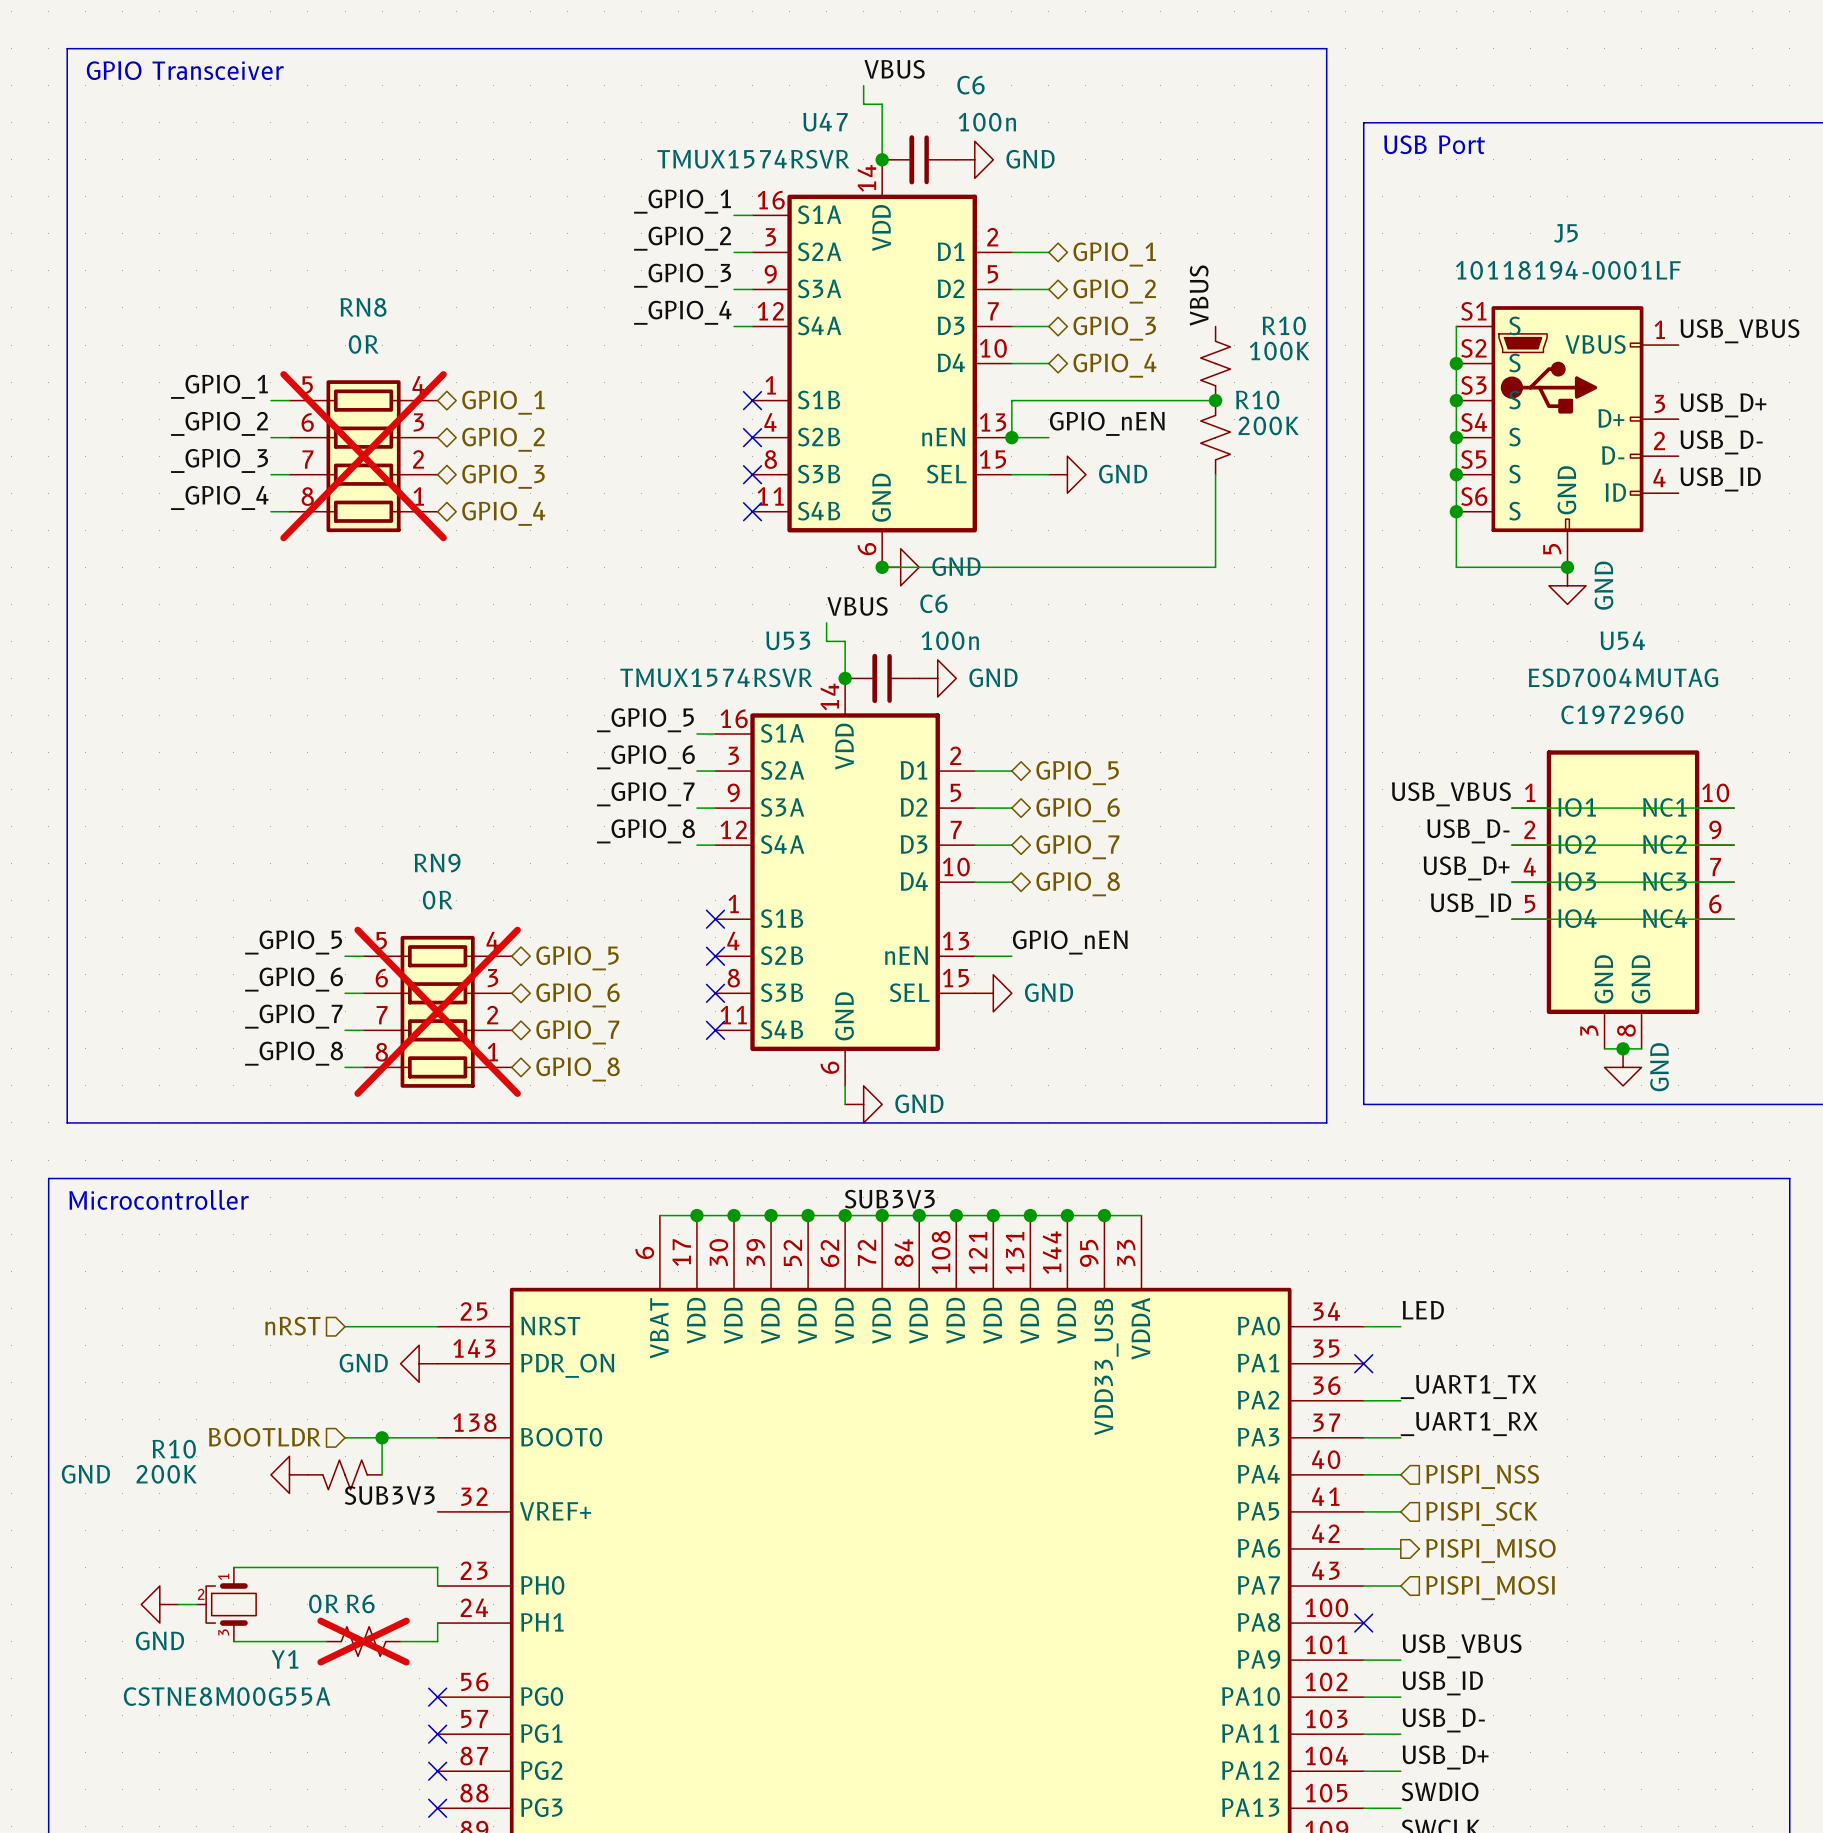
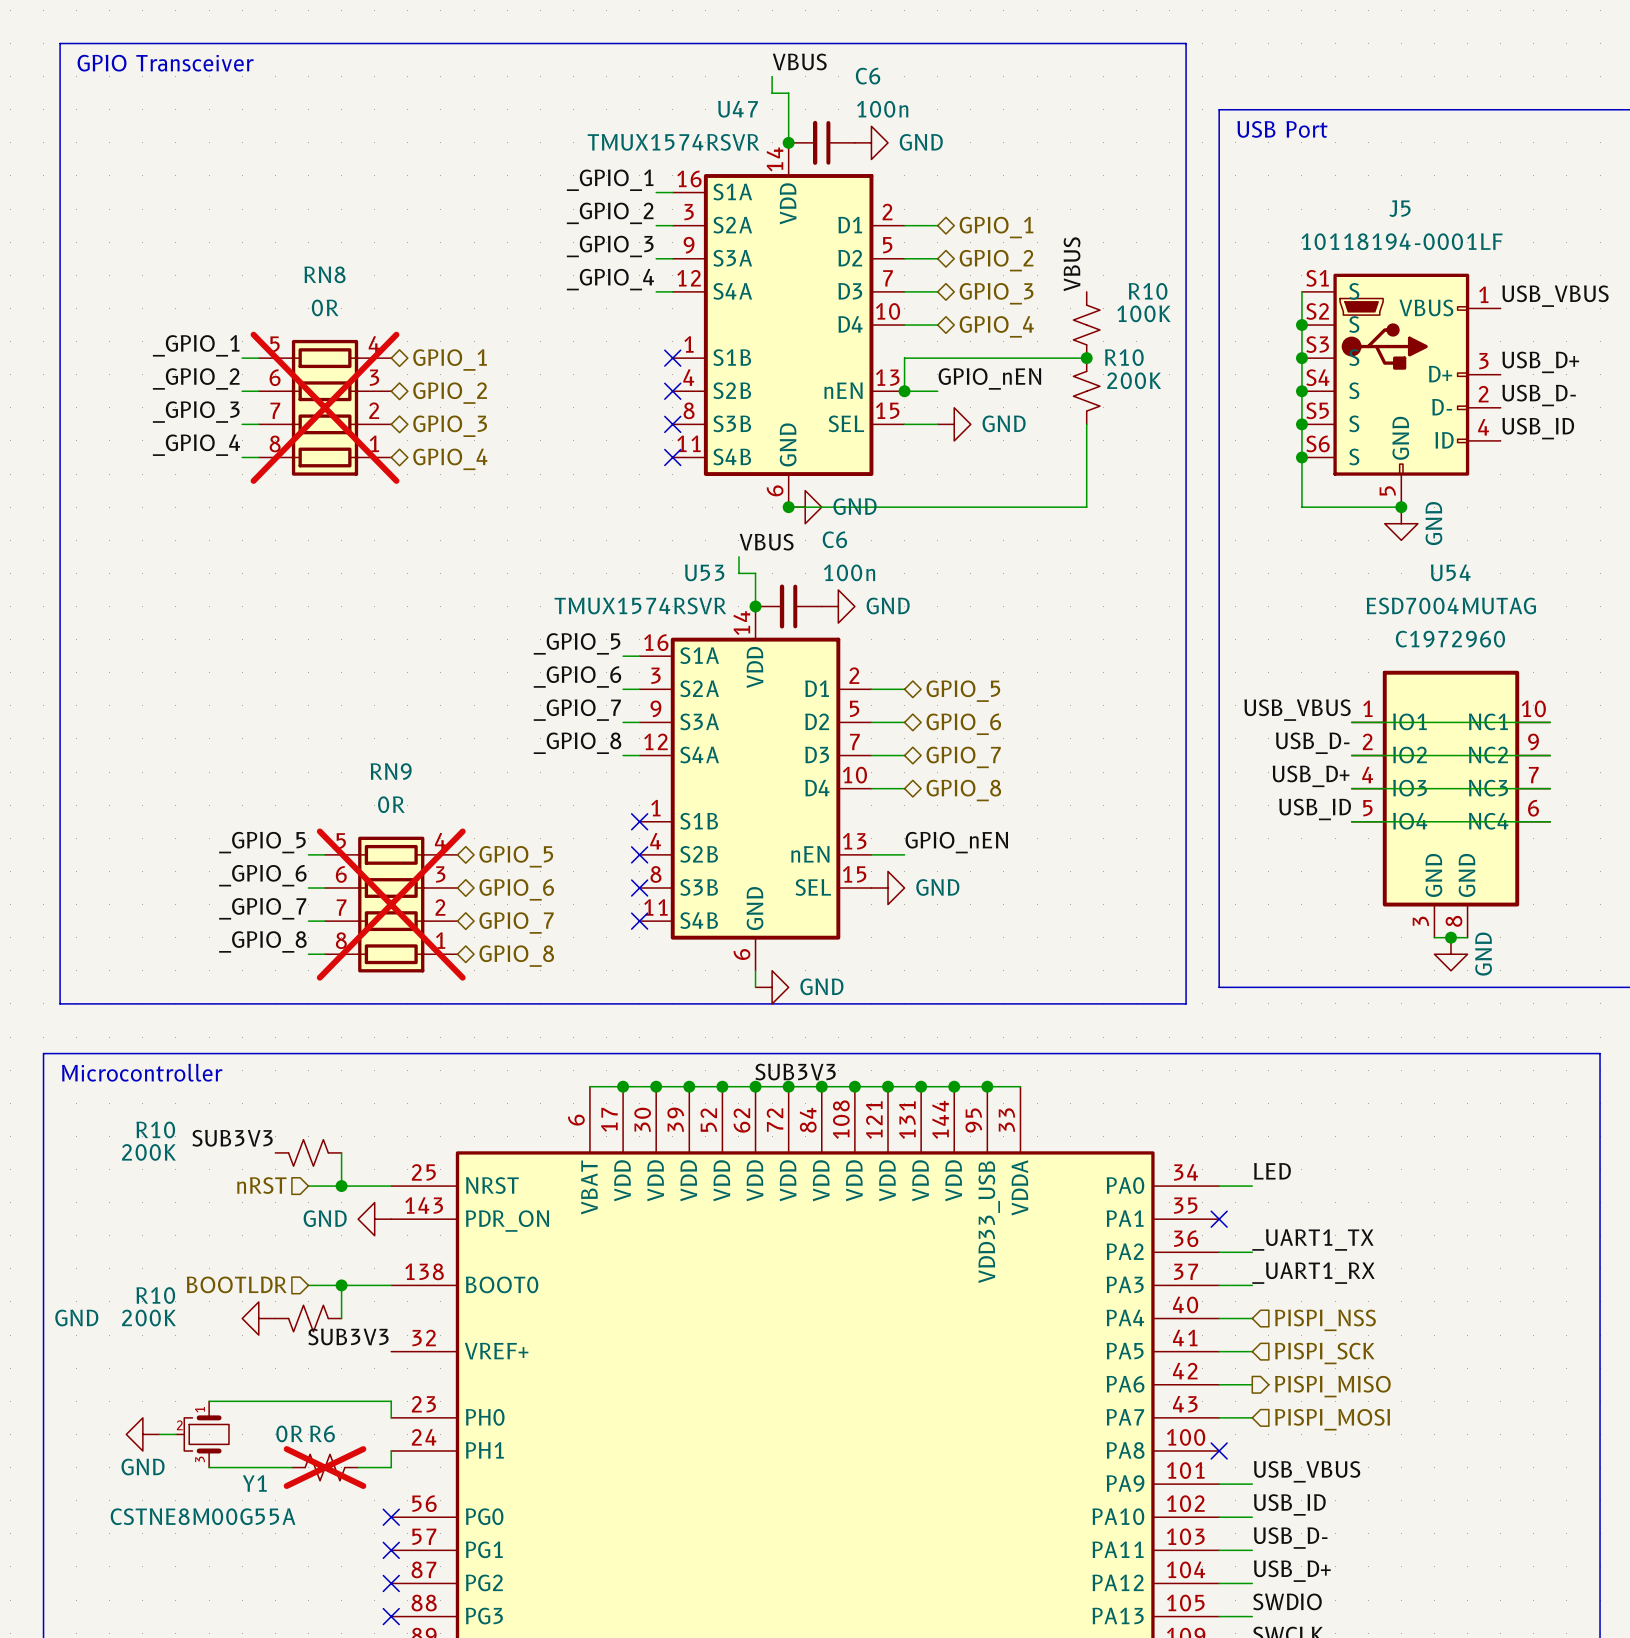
label: none -> SUB3V3 (232, 1138)
R10: none -> 200K (308, 1152)
wire: none -> (341, 1152) (341, 1186)
junction: none -> (341, 1186)

